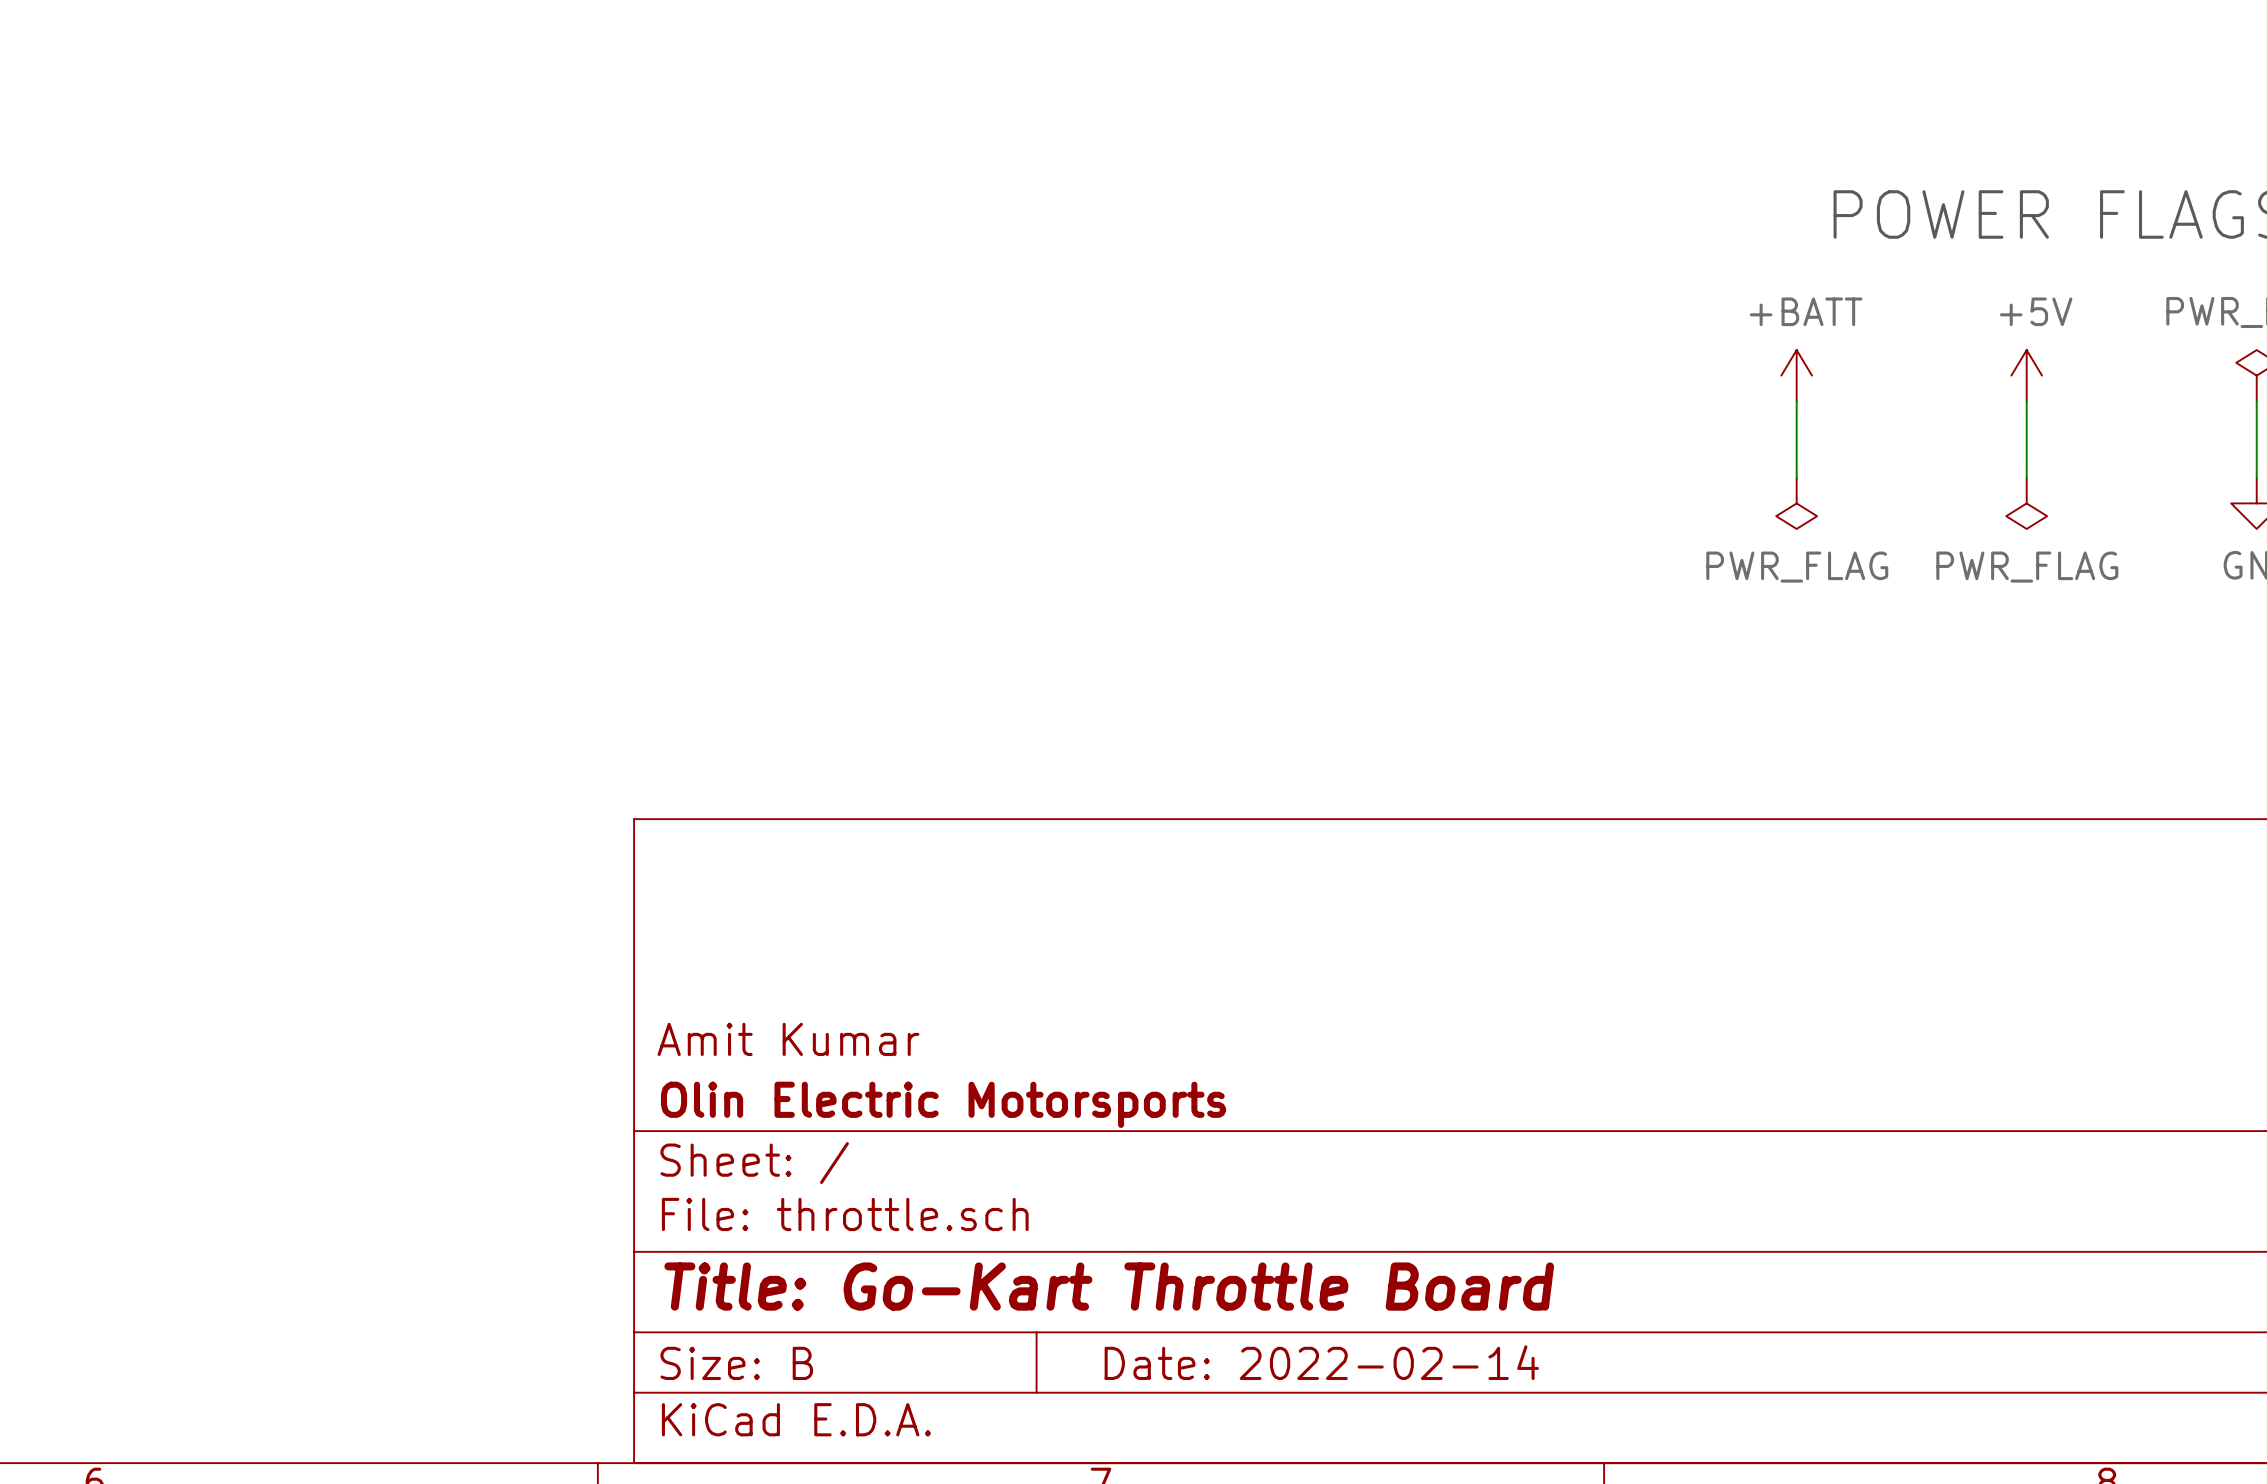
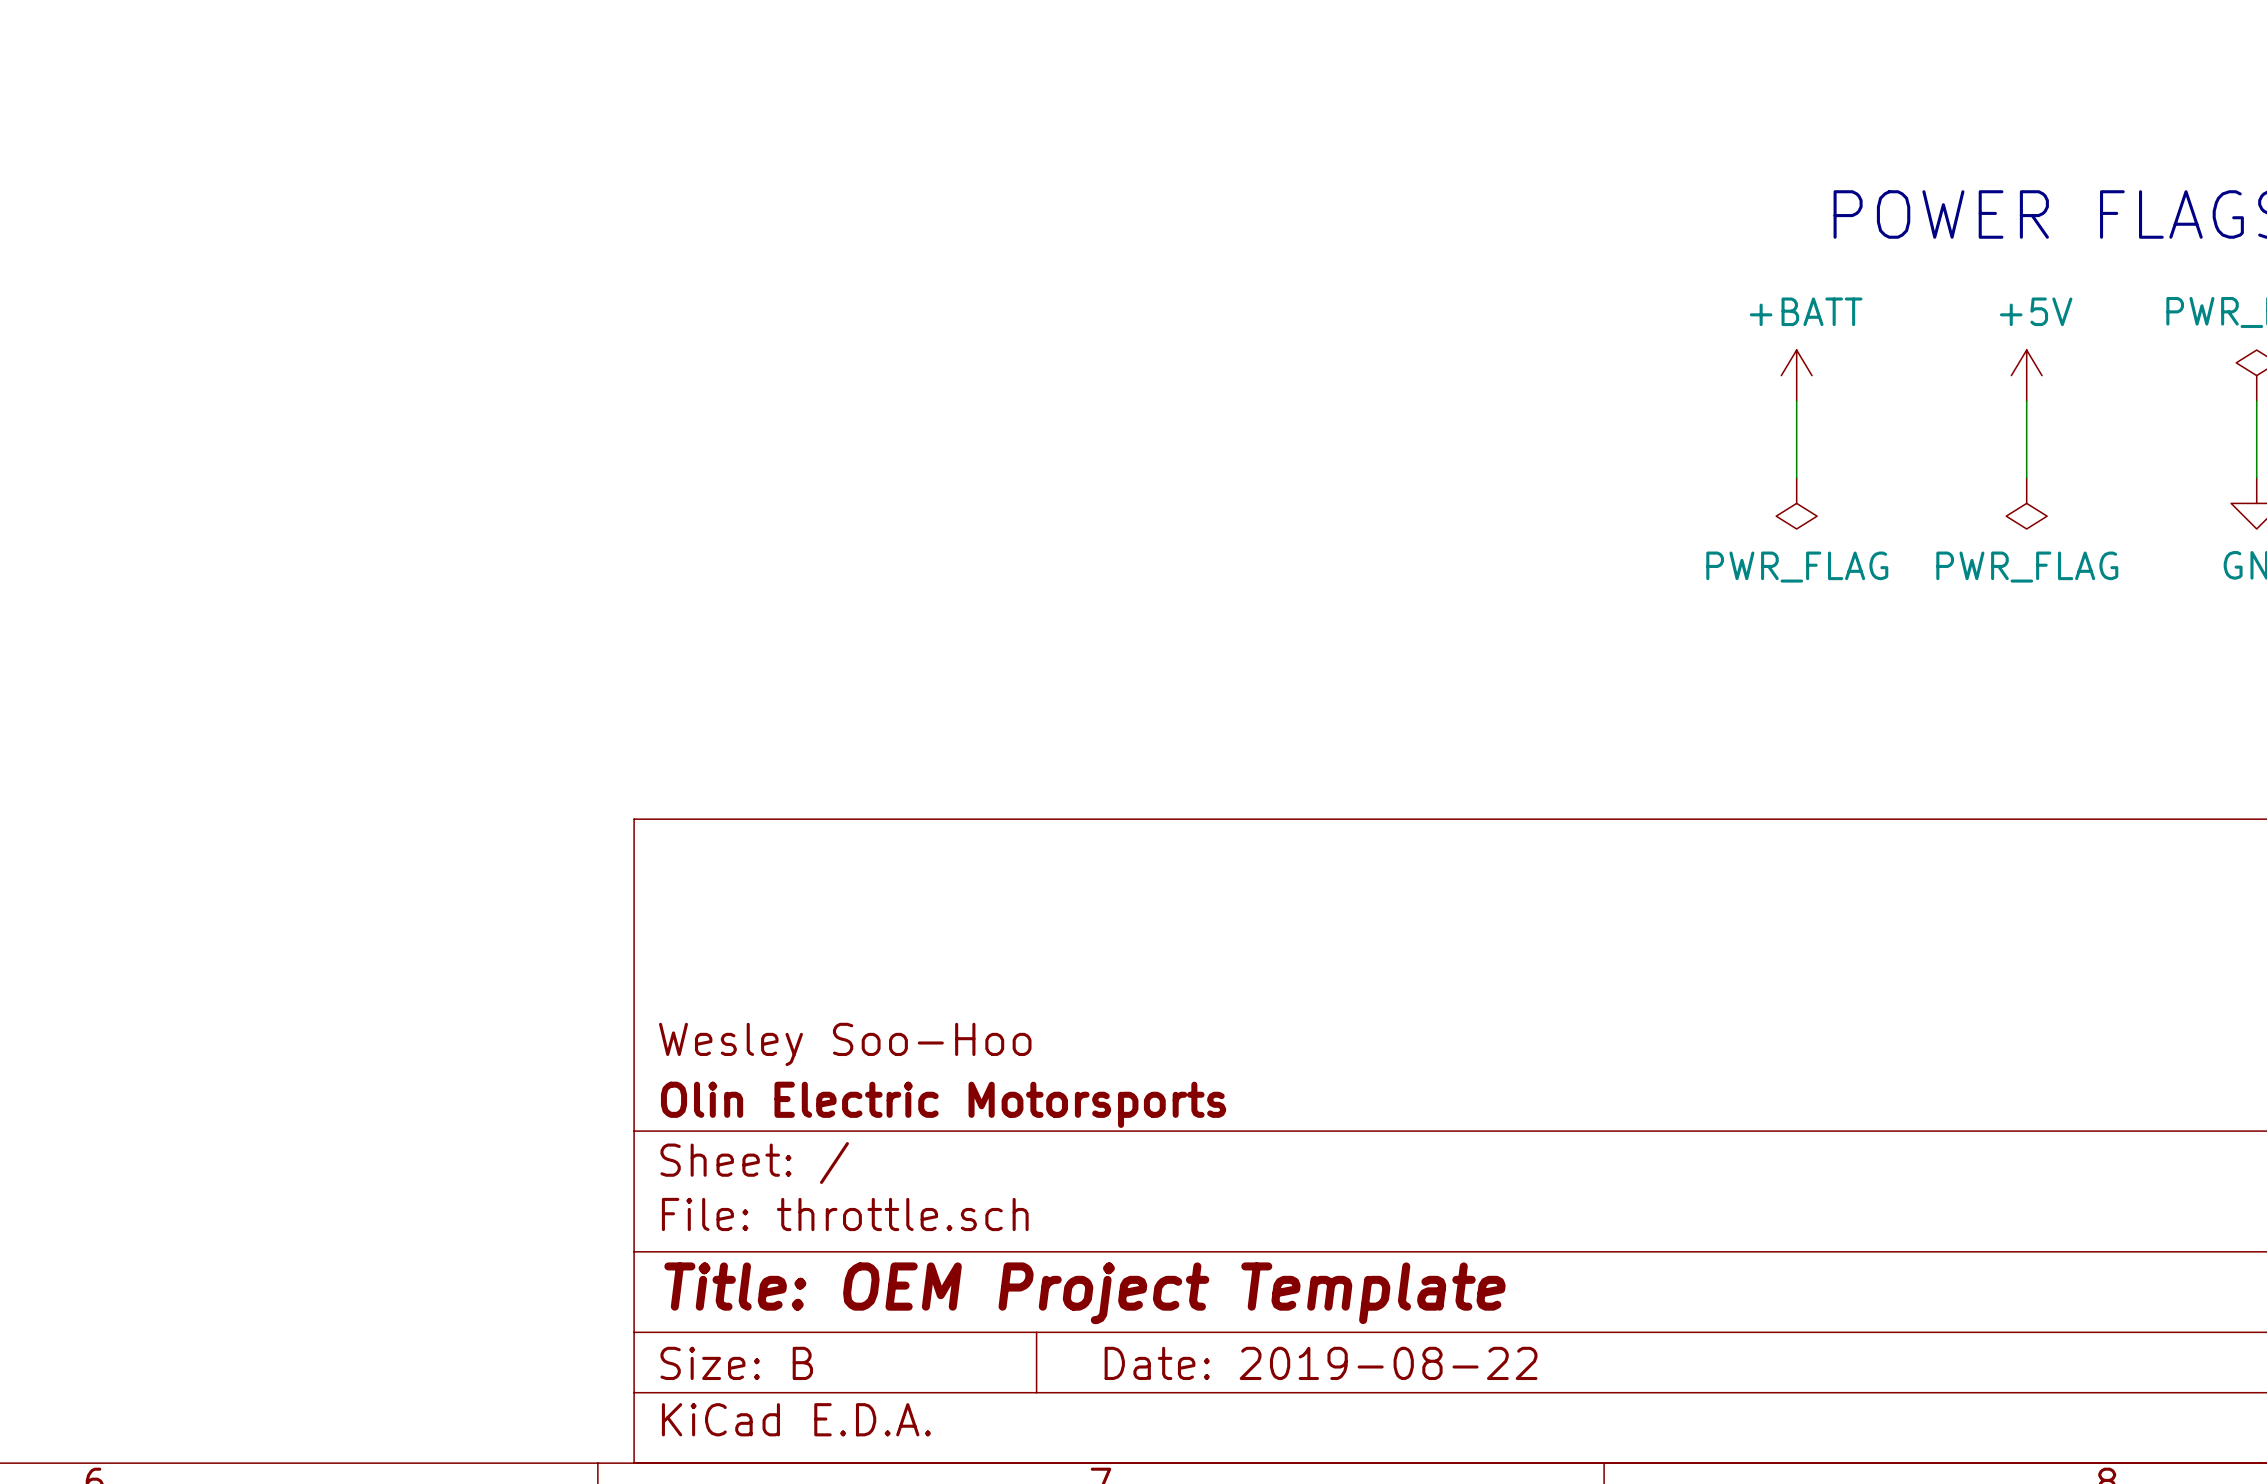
title block: Amit Kumar (788, 1039) -> Wesley Soo-Hoo (845, 1044)
title block: Title: Go-Kart Throttle Board (1109, 1286) -> Title: OEM Project Template (1085, 1293)
title block: Date: 2022-02-14 (1321, 1362) -> Date: 2019-08-22 (1321, 1363)

